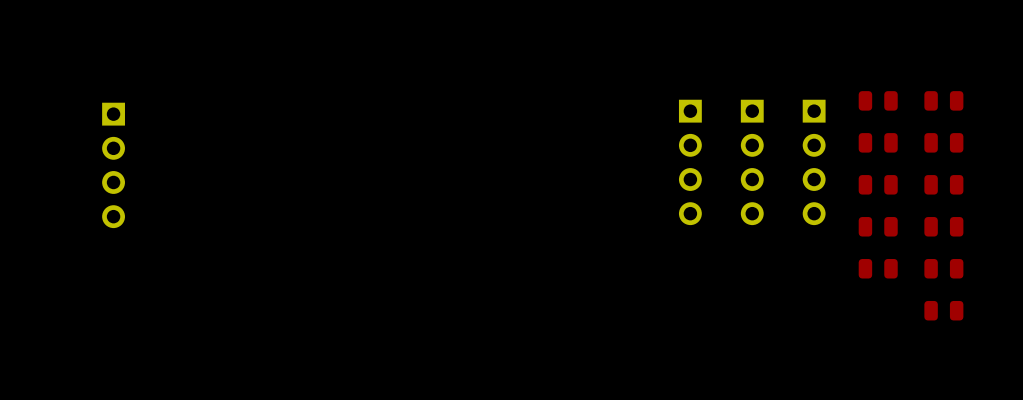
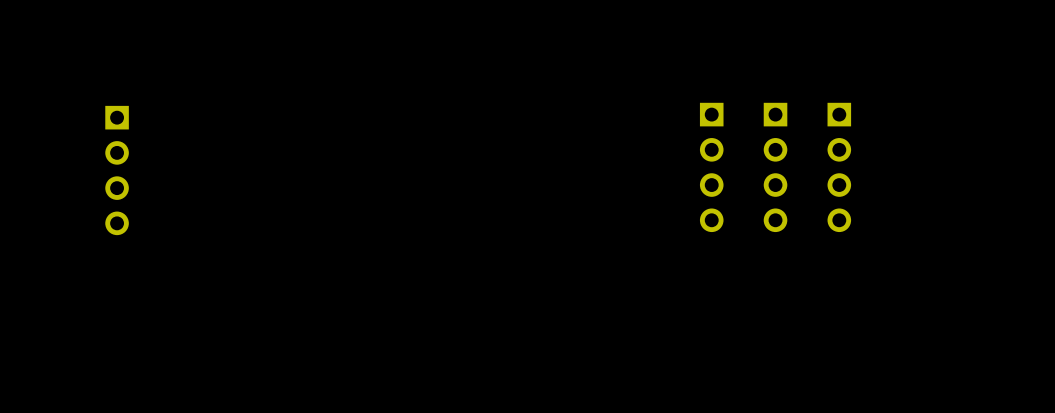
part: (878, 100) -> none
part: (943, 100) -> none
part: (878, 142) -> none
part: (943, 142) -> none
part: (878, 184) -> none
part: (943, 184) -> none
part: (878, 226) -> none
part: (943, 226) -> none
part: (878, 268) -> none
part: (943, 268) -> none
part: (943, 310) -> none

